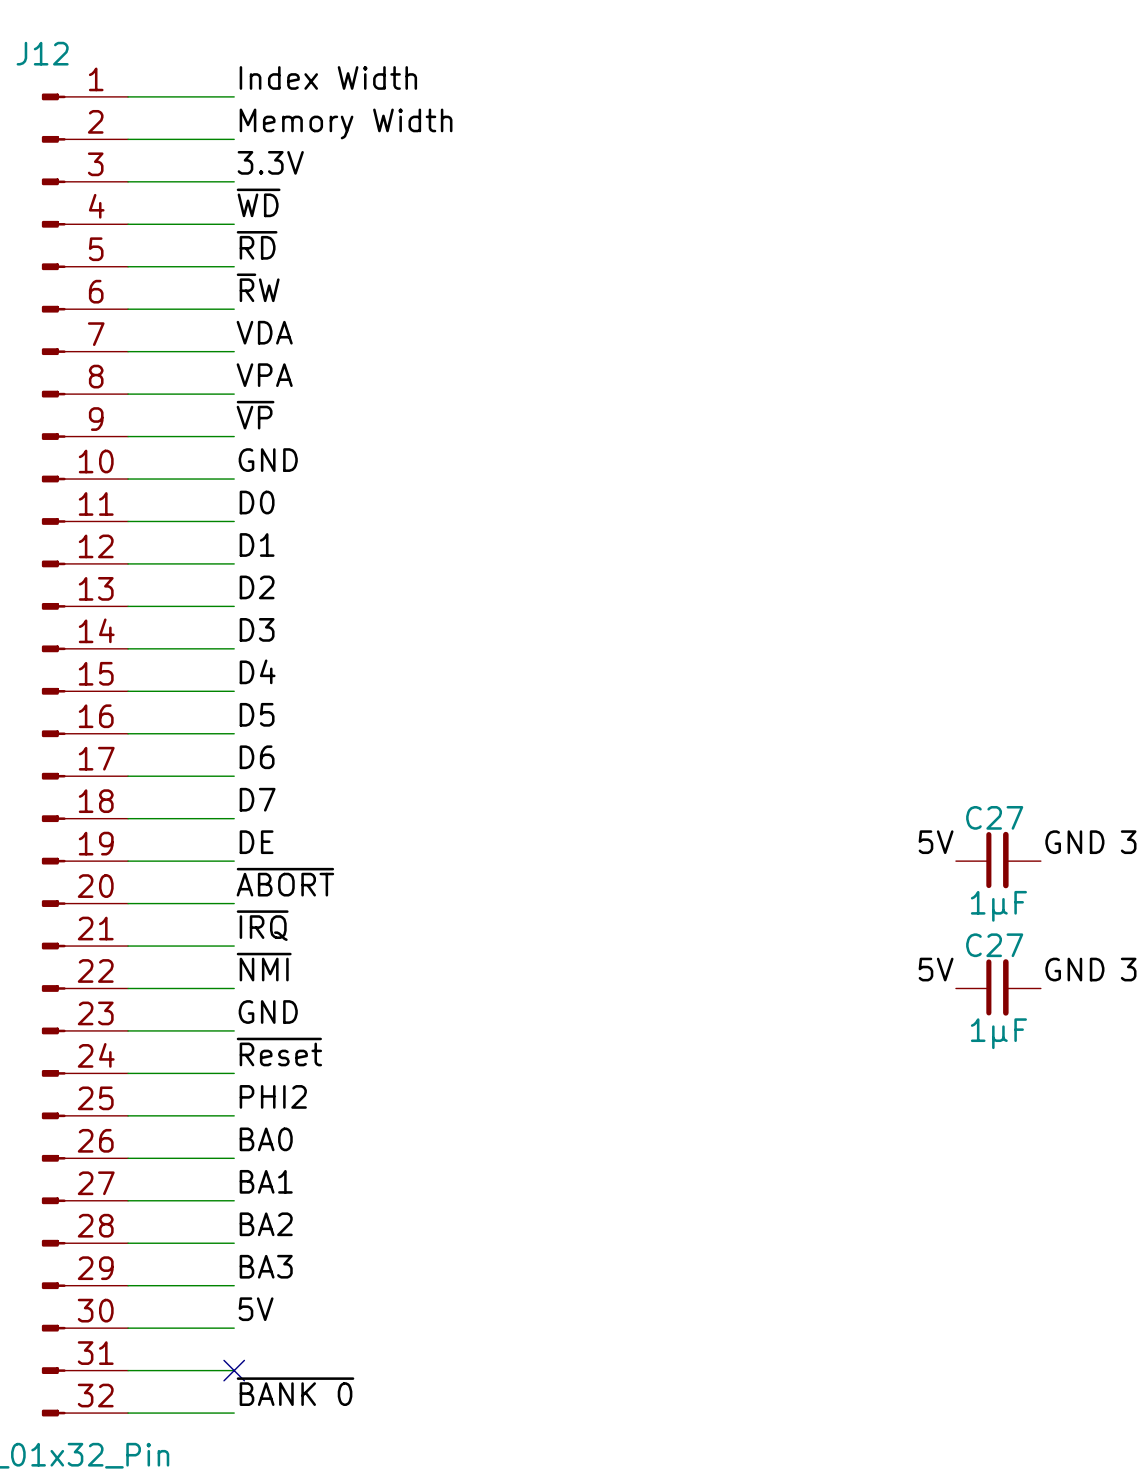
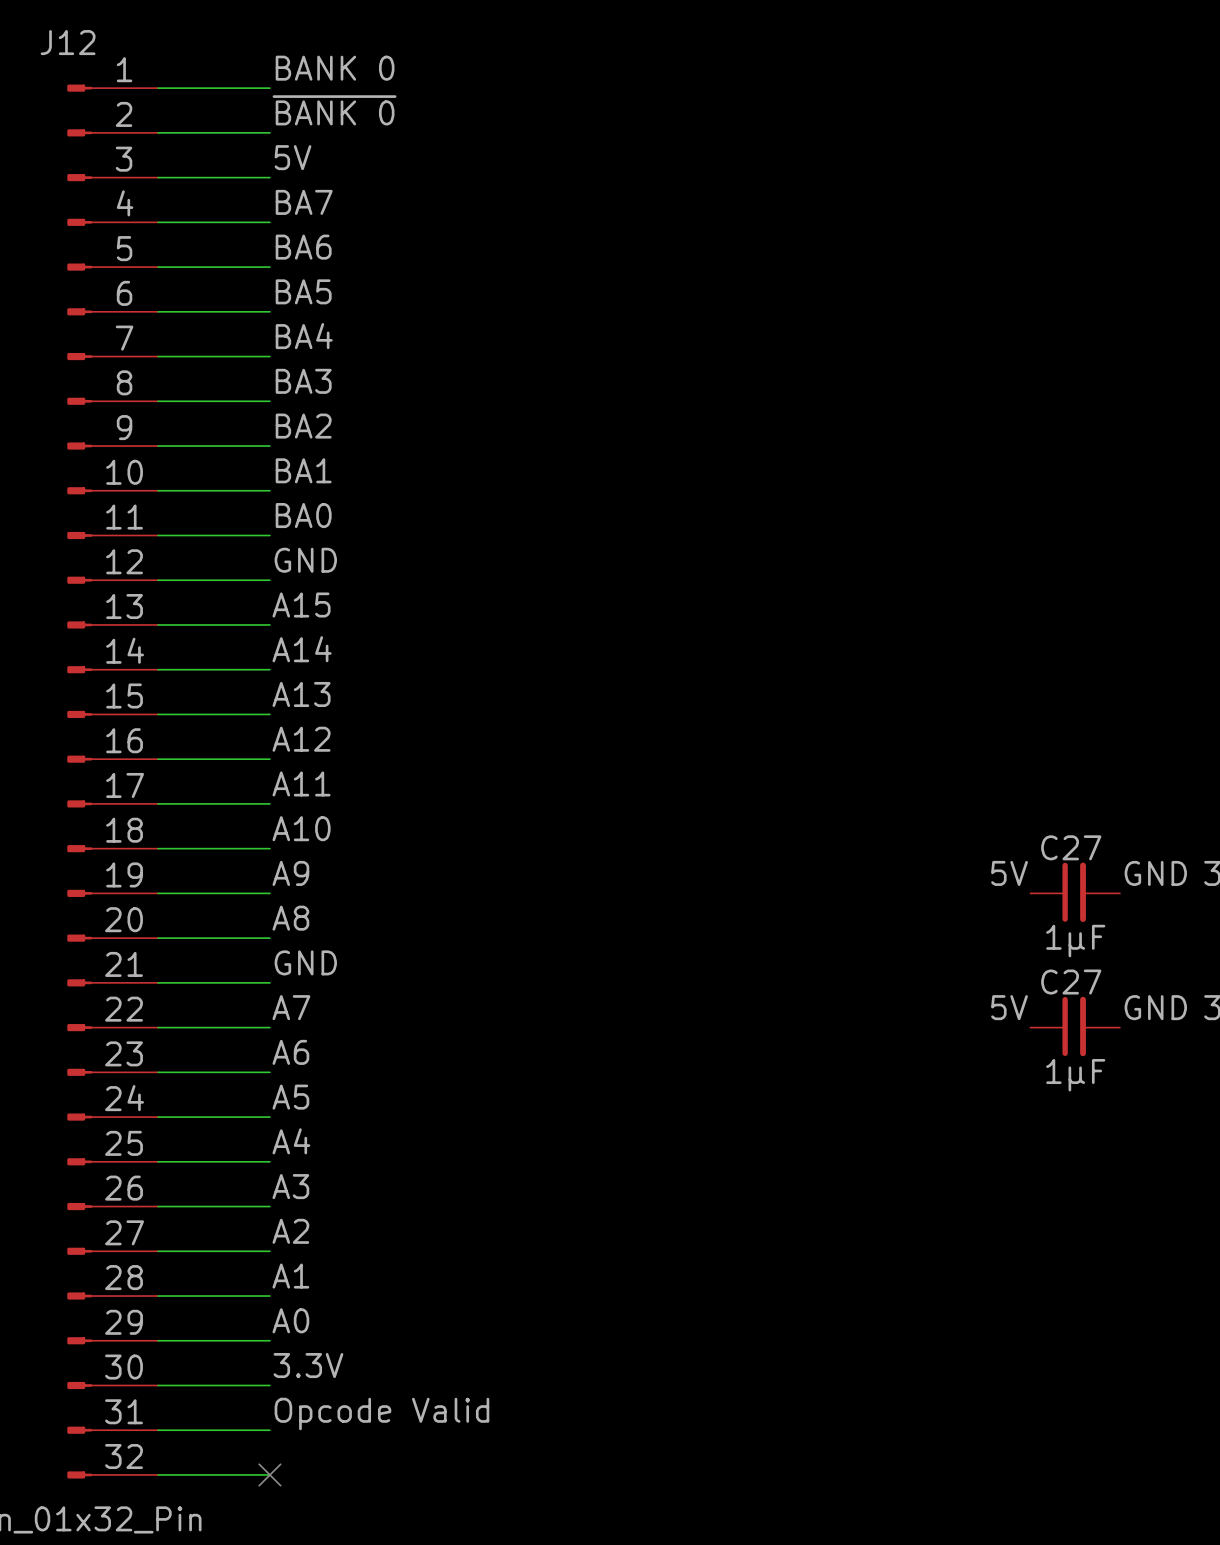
label: Index Width (328, 77) -> BANK 0 (335, 68)
label: Memory Width (346, 123) -> ~{BANK 0} (334, 110)
label: 3.3V (270, 162) -> 5V (293, 157)
label: ~{WD} (258, 202) -> BA7 (304, 202)
label: ~{RD} (257, 245) -> BA6 (303, 247)
label: ~{R}W (258, 287) -> BA5 (303, 291)
label: VDA (264, 332) -> BA4 (304, 336)
label: VPA (264, 375) -> BA3 (303, 381)
label: ~{VP} (255, 415) -> BA2 (303, 426)
label: GND (268, 460) -> BA1 (303, 470)
label: D0 (257, 502) -> BA0 (303, 515)
label: D1 (257, 544) -> GND (305, 560)
label: D2 (257, 587) -> A15 (301, 605)
label: D3 (257, 629) -> A14 (302, 649)
label: D4 (257, 671) -> A13 (301, 694)
label: D5 (257, 714) -> A12 (301, 739)
label: D6 (257, 757) -> A11 (301, 783)
label: D7 (257, 799) -> A10 (301, 828)
label: DE (256, 842) -> A9 (290, 873)
label: ~{ABORT} (285, 882) -> A8 (290, 918)
label: ~{IRQ} (262, 925) -> GND (305, 962)
label: ~{NMI} (264, 967) -> A7 (291, 1007)
label: GND (268, 1012) -> A6 (290, 1052)
label: ~{Reset} (279, 1052) -> A5 (290, 1097)
label: PHI2 (273, 1096) -> A4 (291, 1141)
label: BA0 (266, 1139) -> A3 (290, 1186)
label: BA1 (266, 1181) -> A2 (290, 1231)
label: BA2 (266, 1224) -> A1 (290, 1276)
label: BA3 (266, 1266) -> A0 (290, 1320)
label: 5V (256, 1309) -> 3.3V (308, 1365)
label: none -> Opcode Valid (381, 1414)
no-connect mark position: (234, 1370) -> (269, 1474)
label: ~{BANK 0} (295, 1391) -> none

